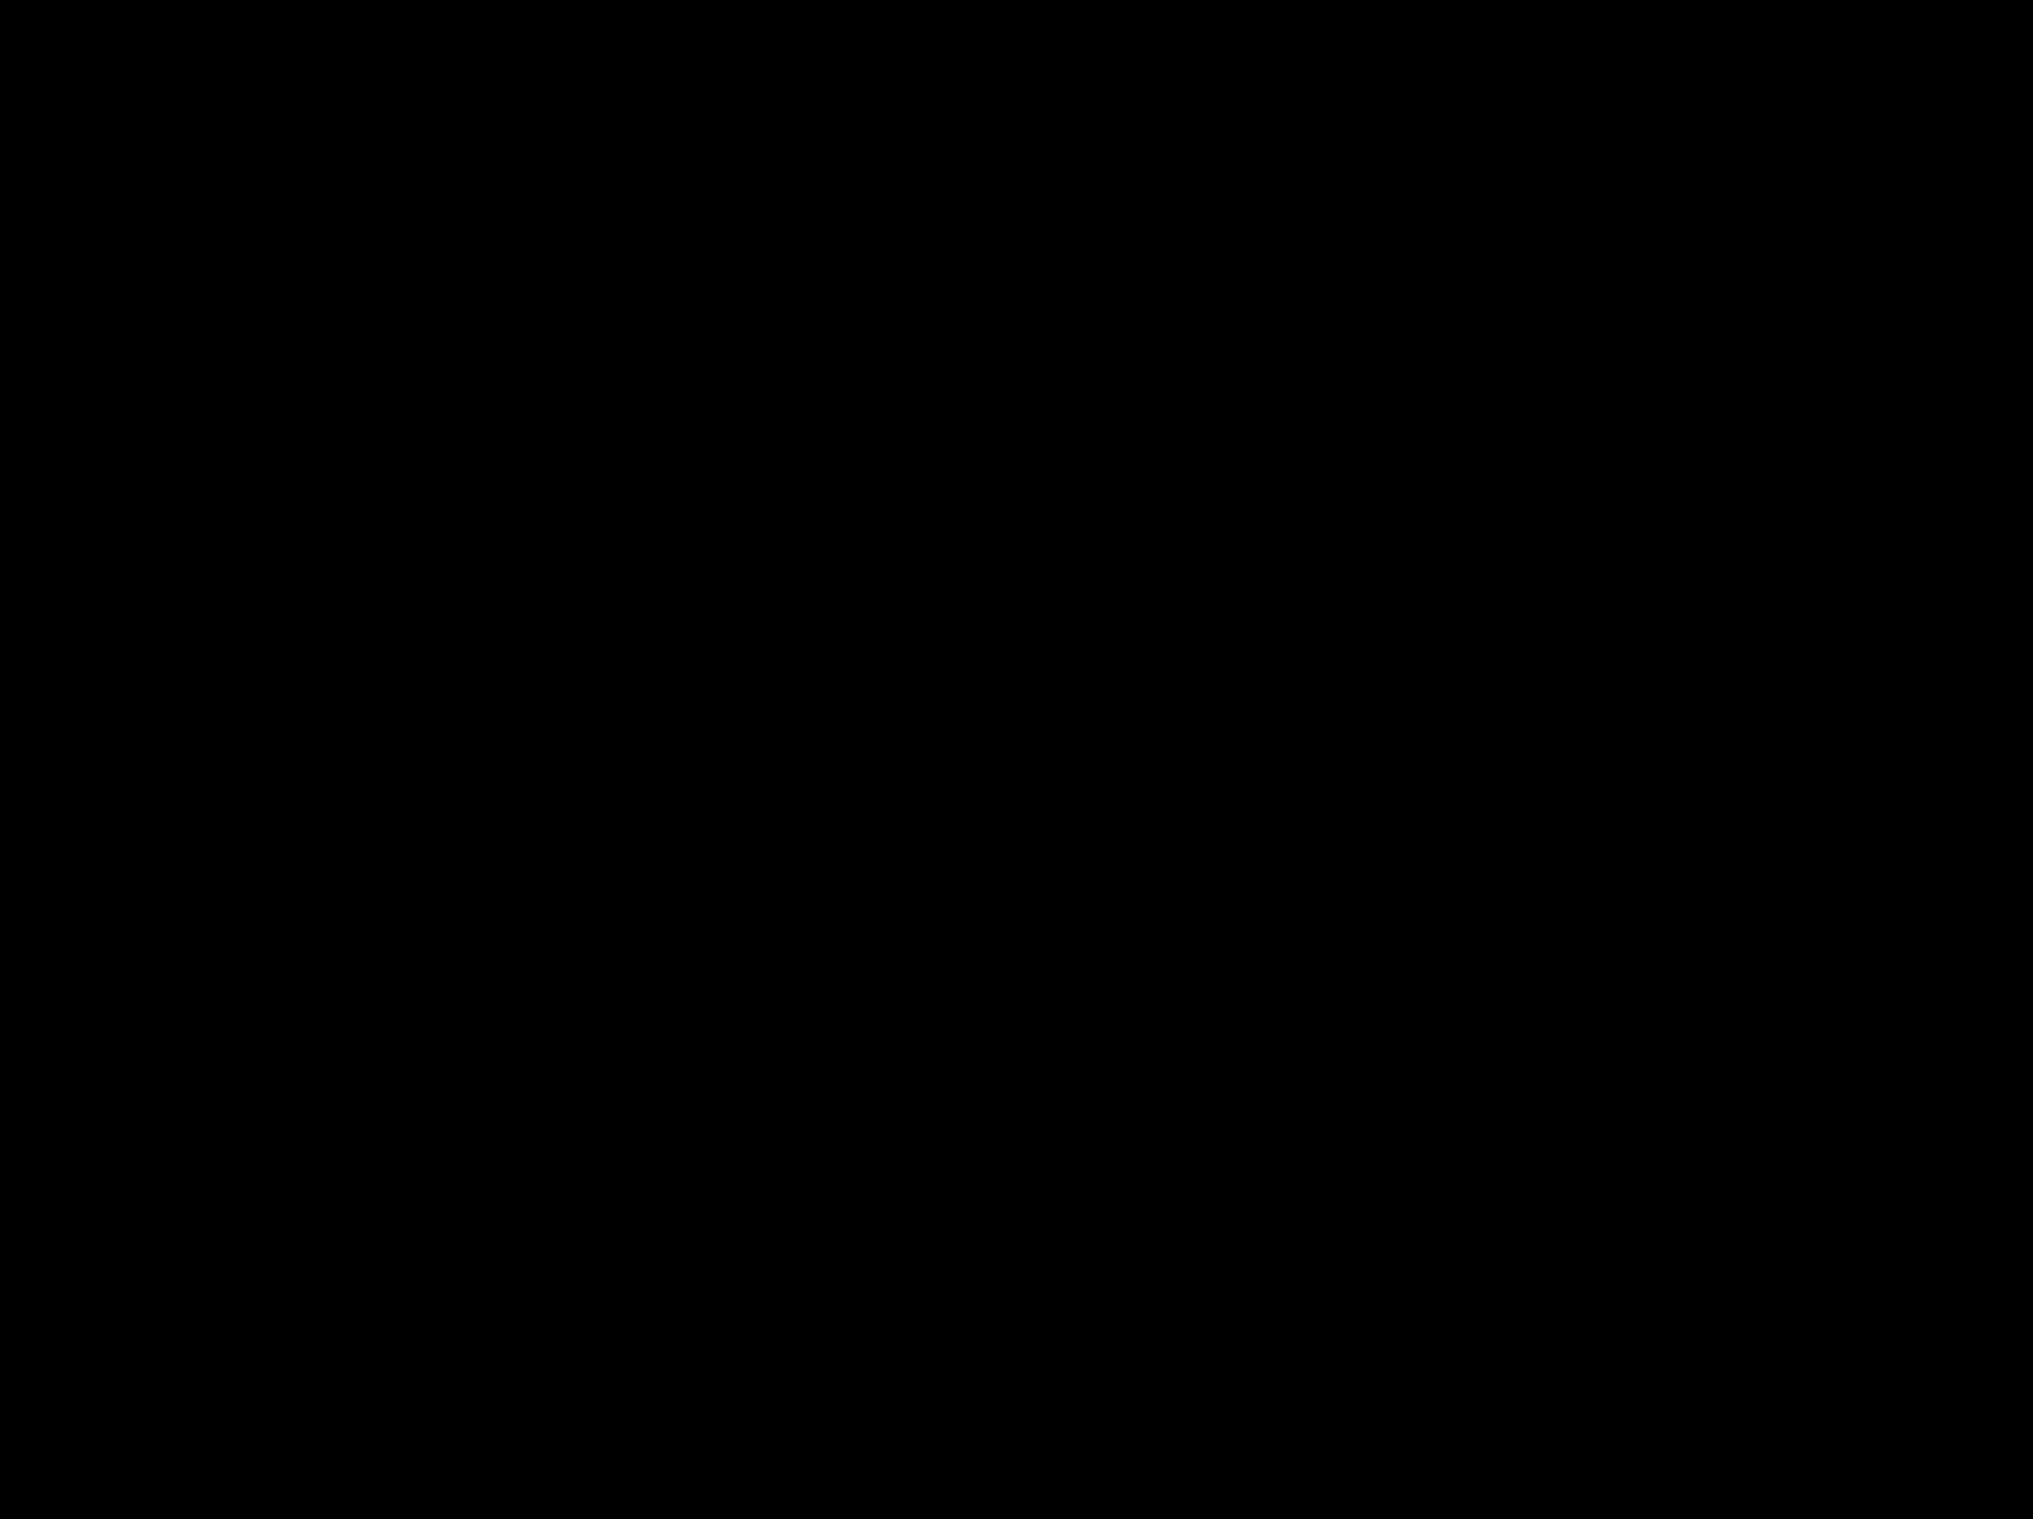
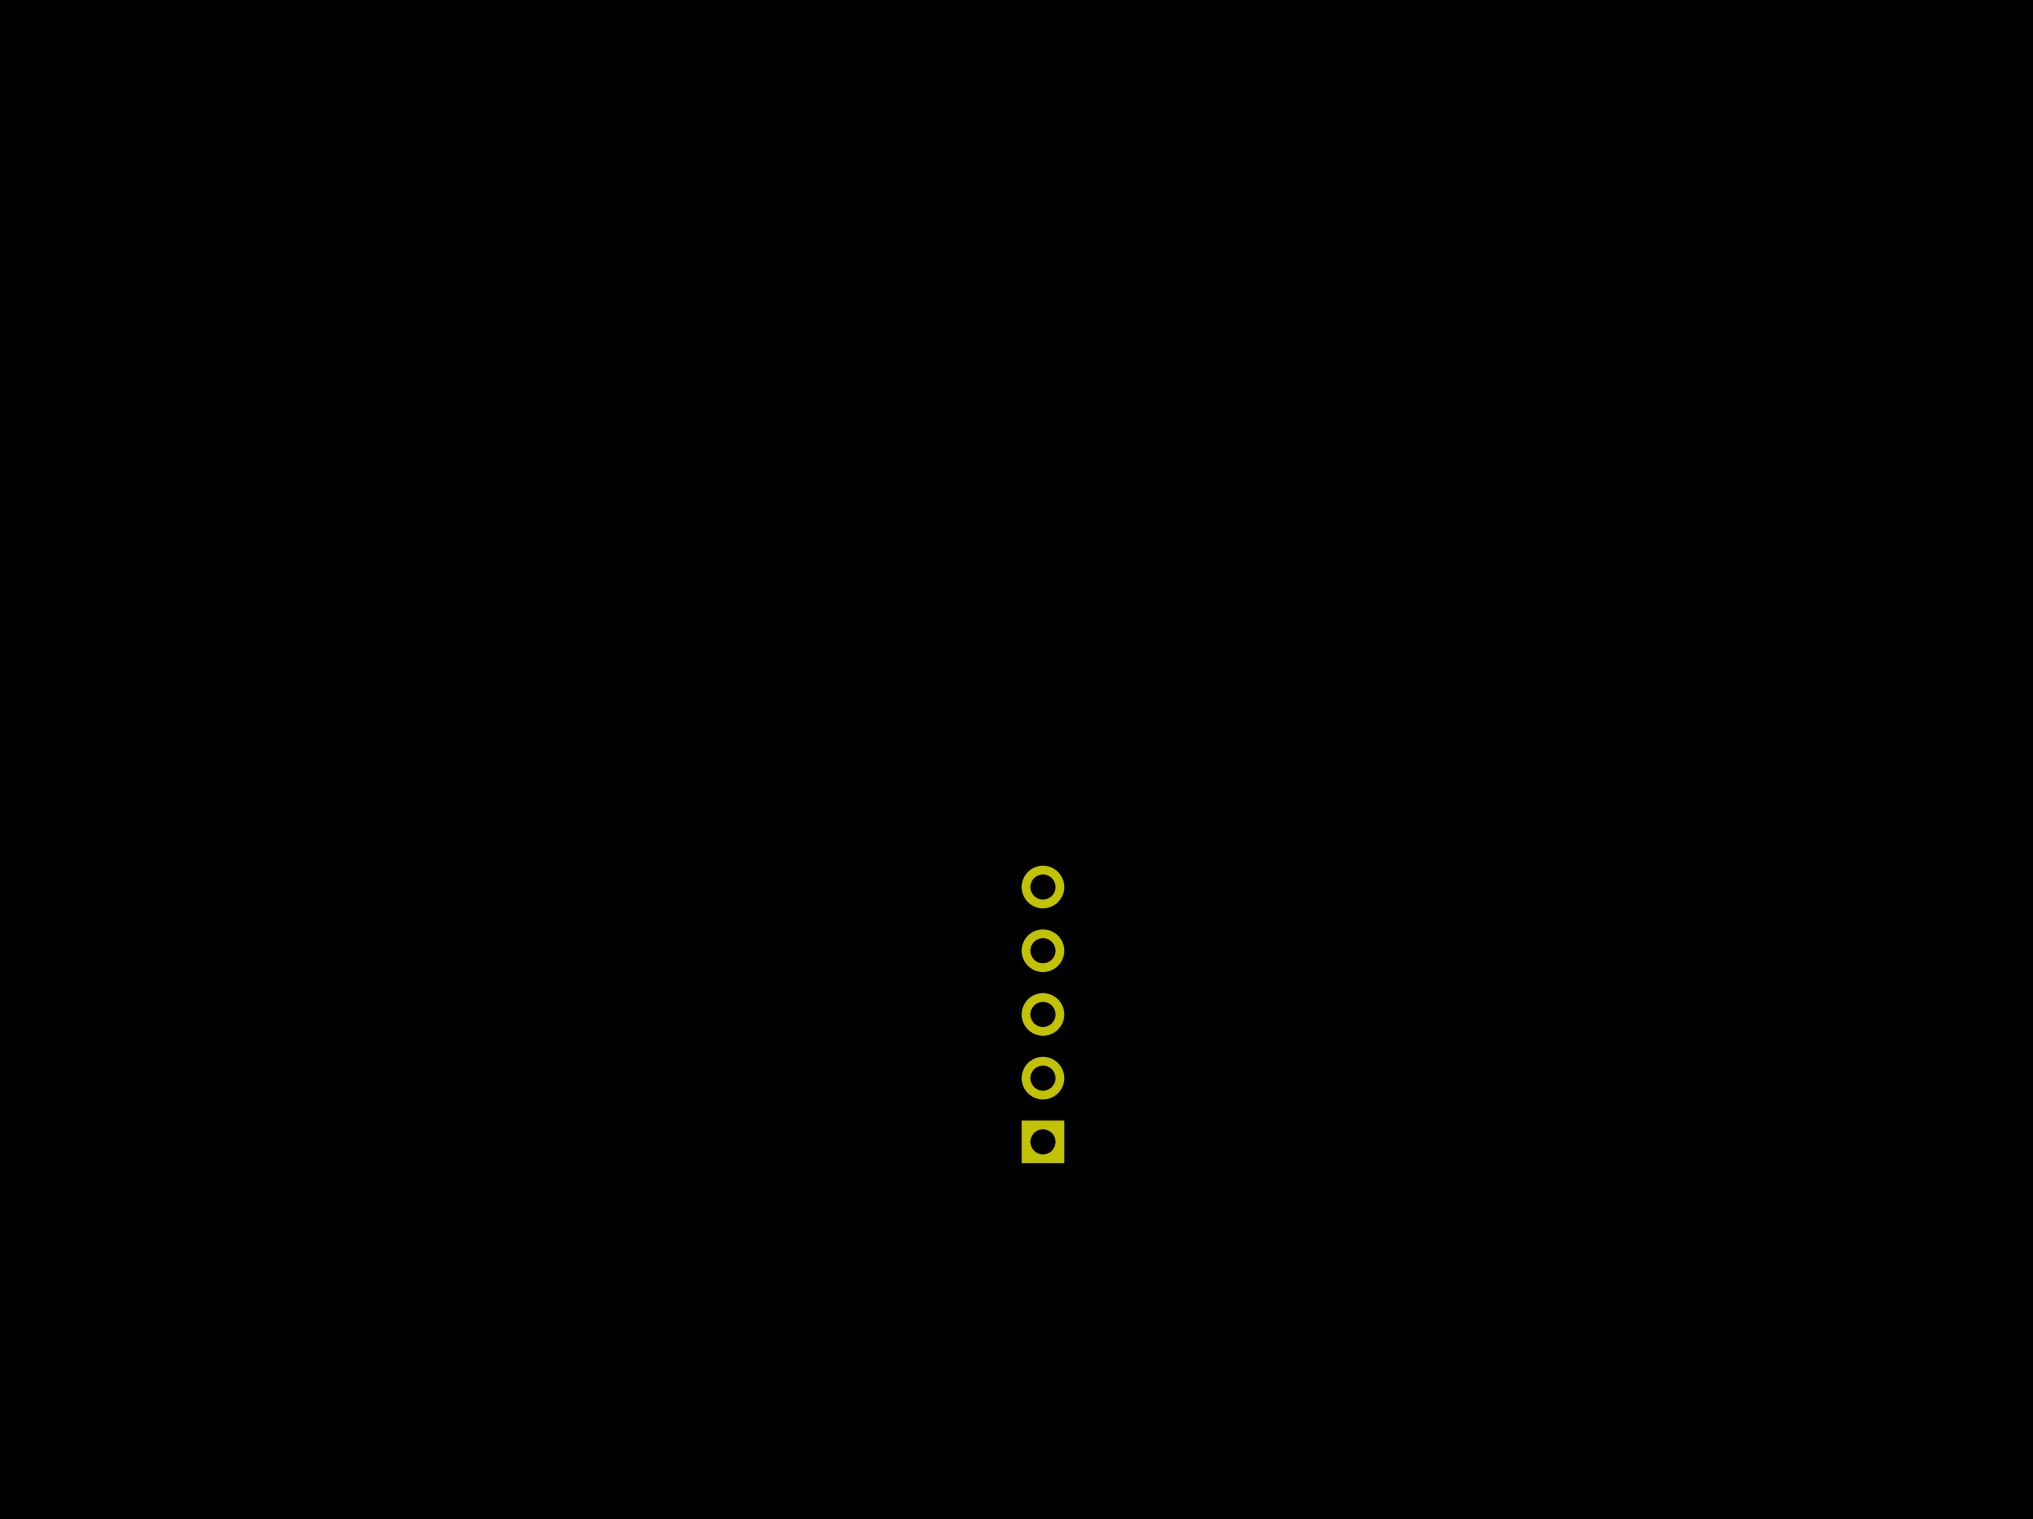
part: none -> (1042, 1014)

